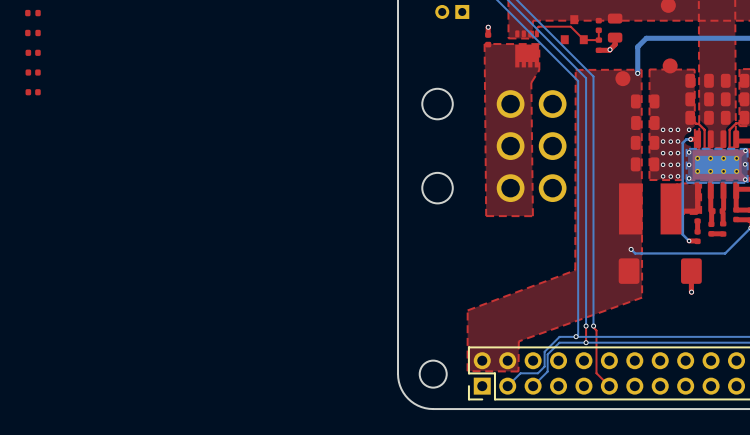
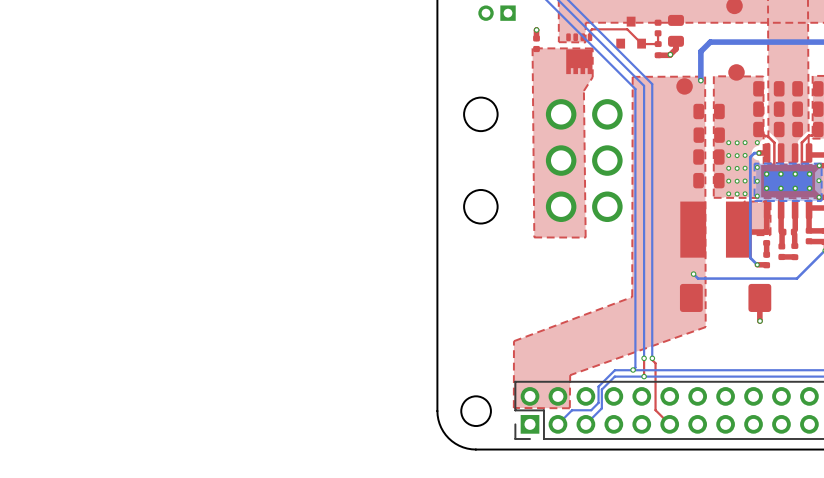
part: (32, 13) -> none
part: (32, 32) -> none
part: (33, 52) -> none
part: (33, 72) -> none
part: (33, 92) -> none

